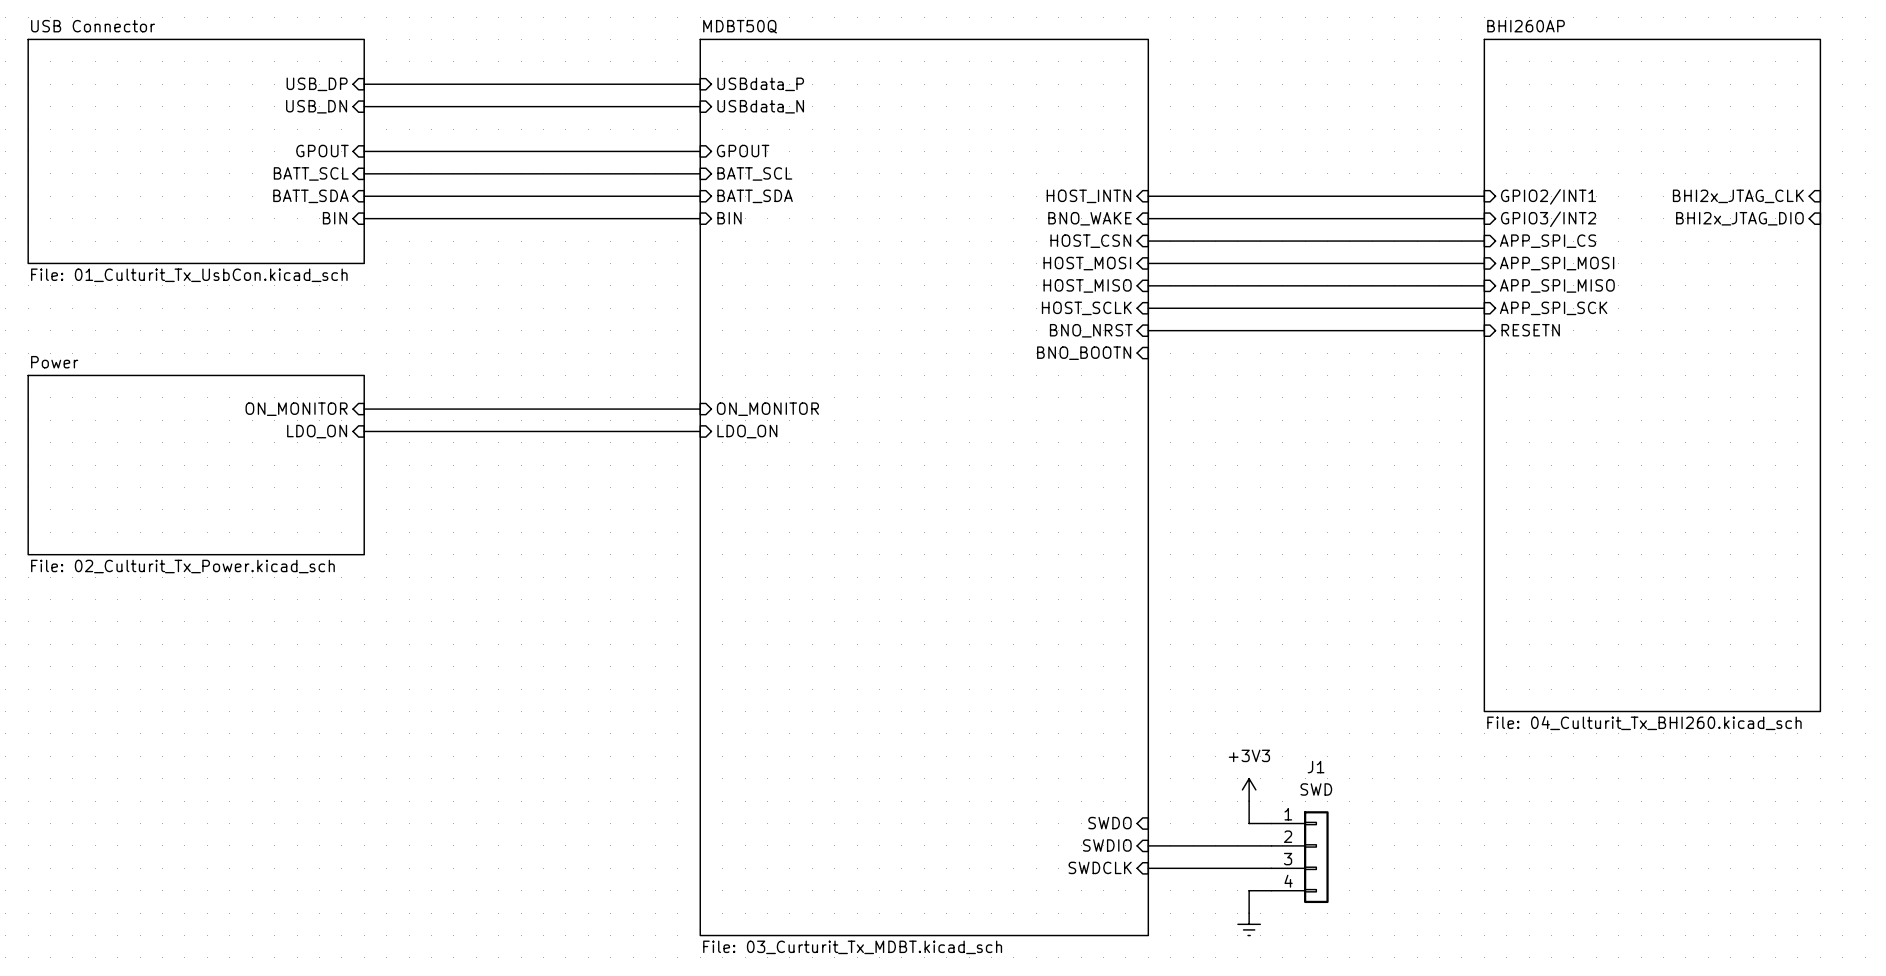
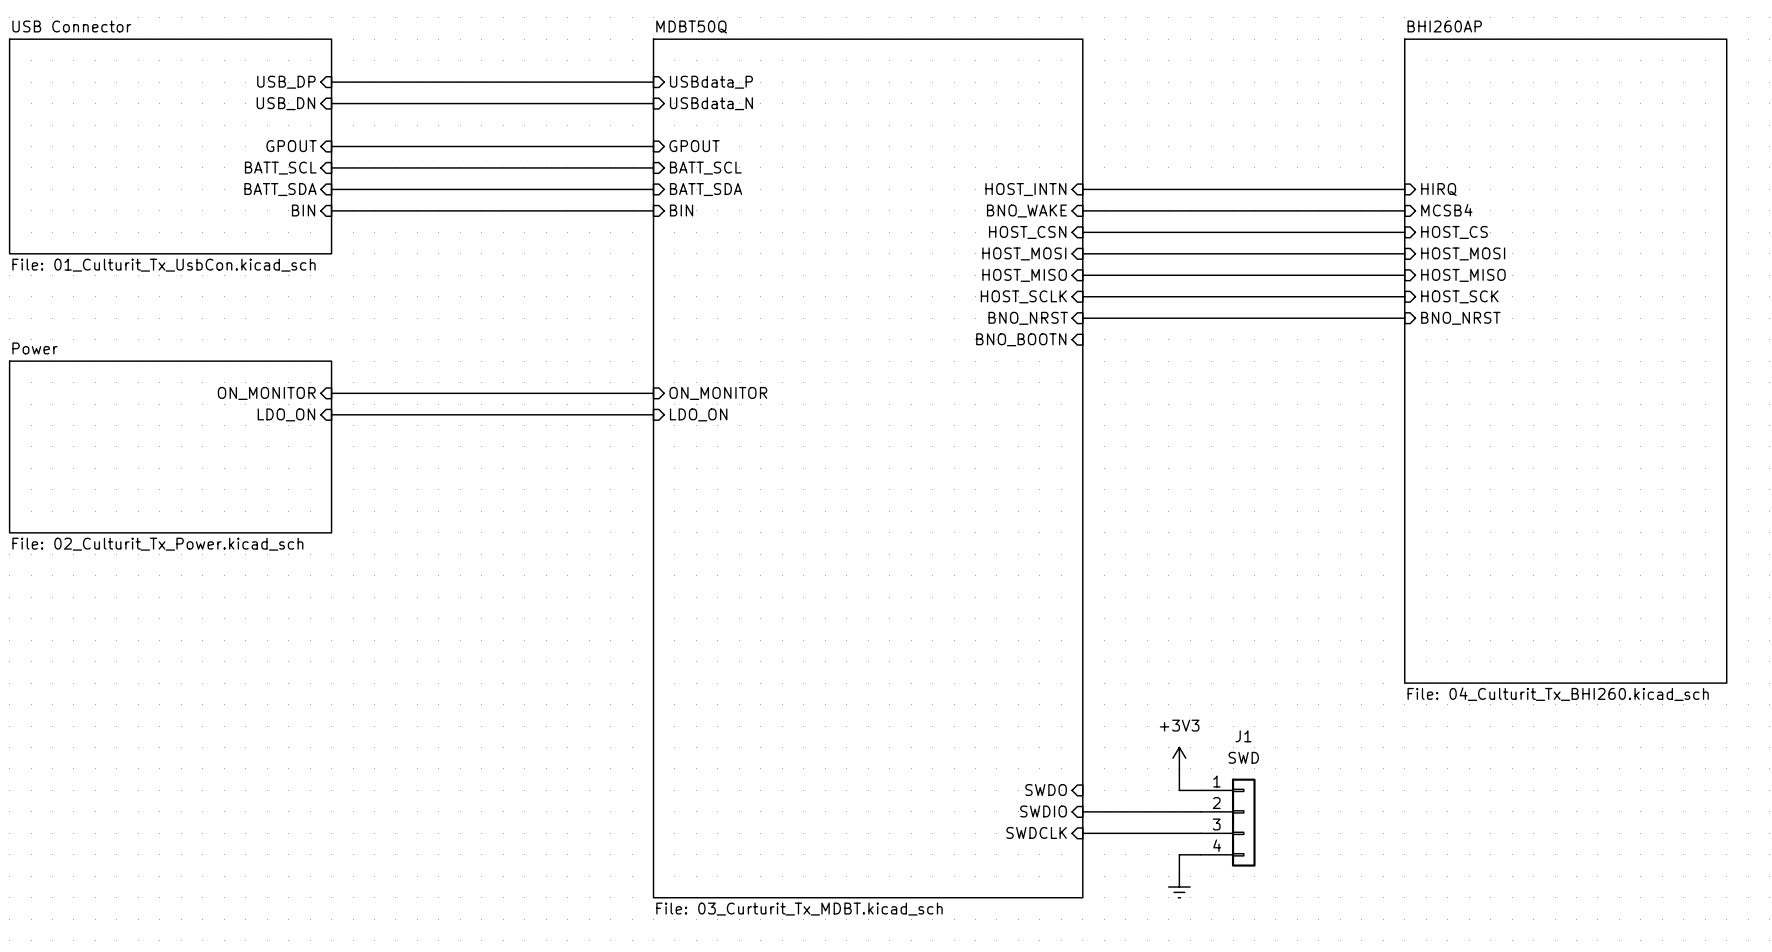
sheet pin: GPIO2/INT1 (1548, 196) -> HIRQ (1438, 189)
sheet pin: BHI2x_JTAG_CLK (1738, 196) -> none
sheet pin: BHI2x_JTAG_DIO (1739, 218) -> none
sheet pin: GPIO3/INT2 (1548, 219) -> MCSB4 (1446, 210)
sheet pin: APP_SPI_CS (1548, 241) -> HOST_CS (1454, 232)
sheet pin: APP_SPI_MOSI (1557, 263) -> HOST_MOSI (1463, 253)
sheet pin: APP_SPI_MISO (1557, 285) -> HOST_MISO (1463, 275)
sheet pin: APP_SPI_SCK (1553, 308) -> HOST_SCK (1459, 296)
sheet pin: RESETN (1530, 330) -> BNO_NRST (1460, 318)

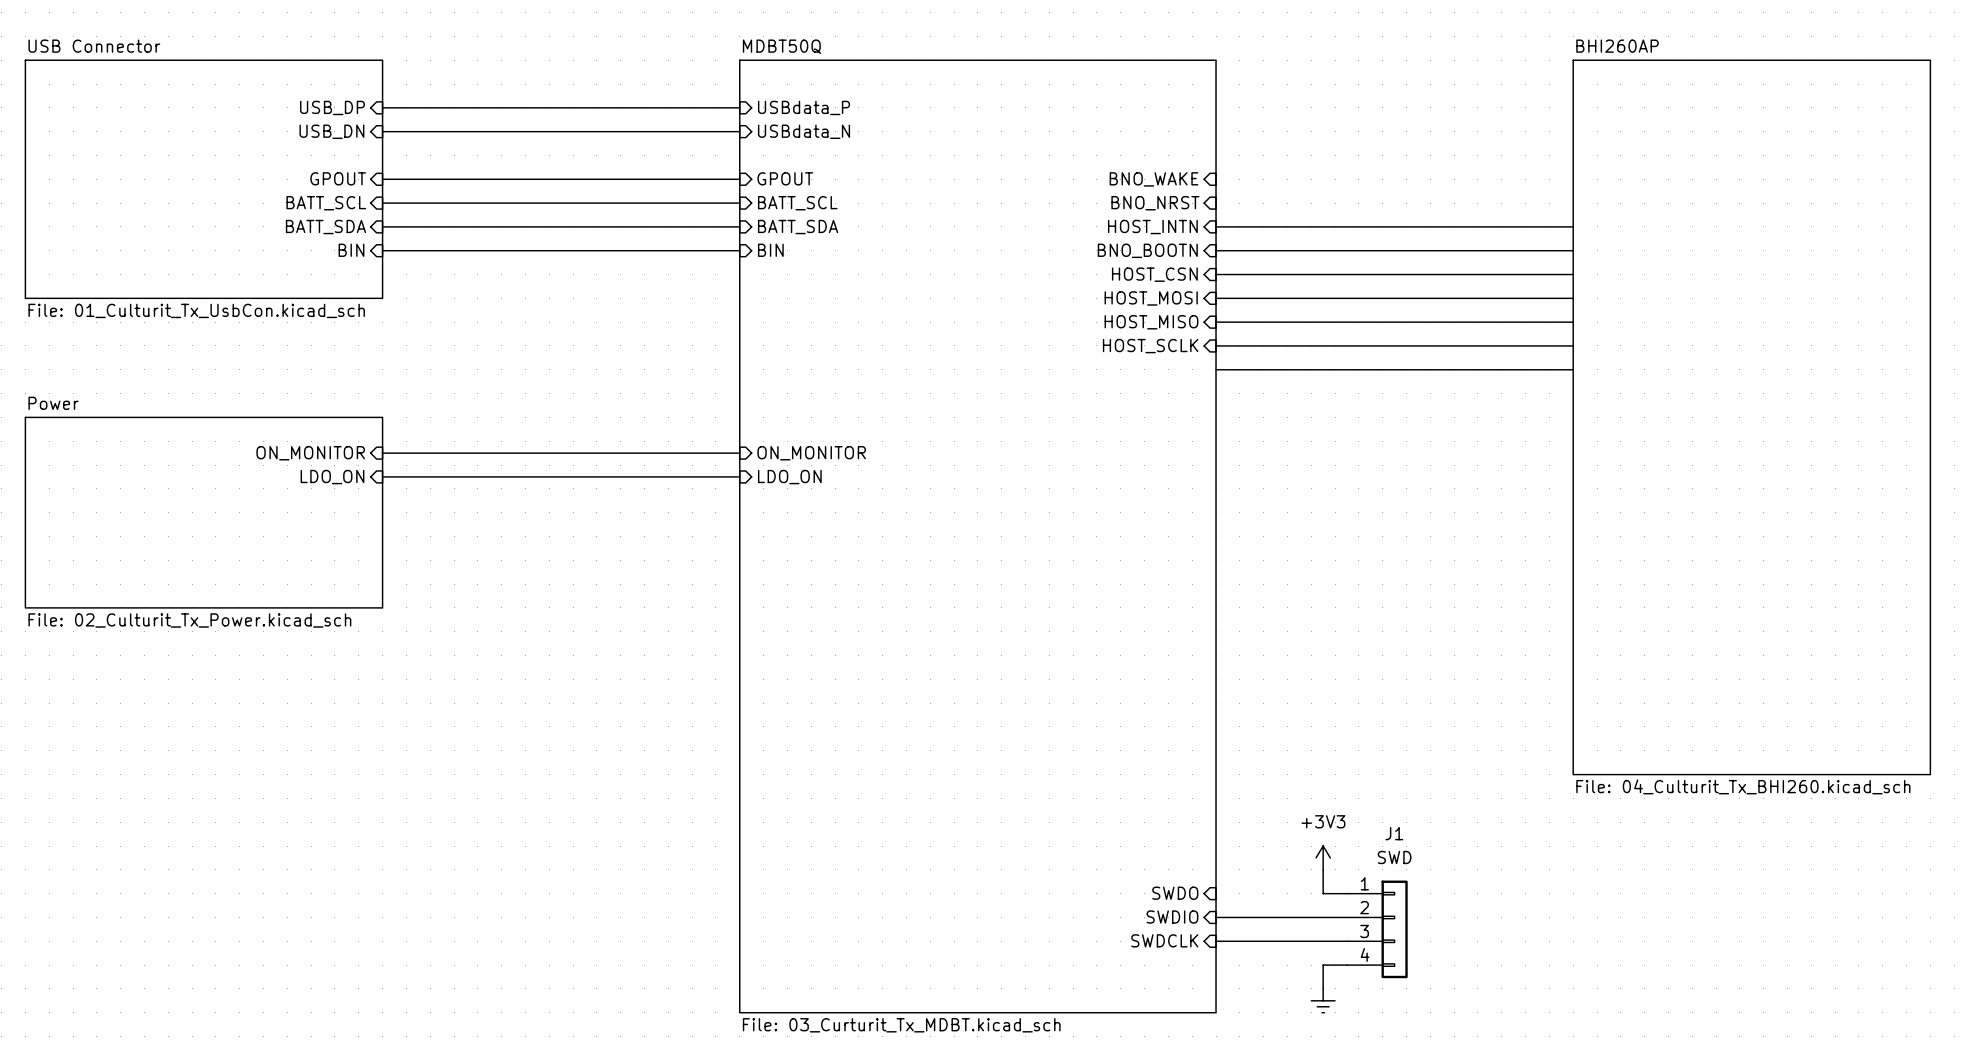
sheet pin: none -> BNO_WAKE (1154, 179)
sheet pin: HIRQ (1438, 189) -> none
sheet pin: MCSB4 (1446, 210) -> none
sheet pin: BNO_WAKE (1026, 211) -> BNO_BOOTN (1147, 250)
sheet pin: HOST_CS (1454, 232) -> none
sheet pin: HOST_MOSI (1463, 253) -> none
sheet pin: HOST_MISO (1463, 275) -> none
sheet pin: HOST_SCK (1459, 296) -> none
sheet pin position: BNO_NRST (1028, 318) -> BNO_NRST (1155, 203)
sheet pin: BNO_NRST (1460, 318) -> none
sheet pin: BNO_BOOTN (1021, 339) -> none

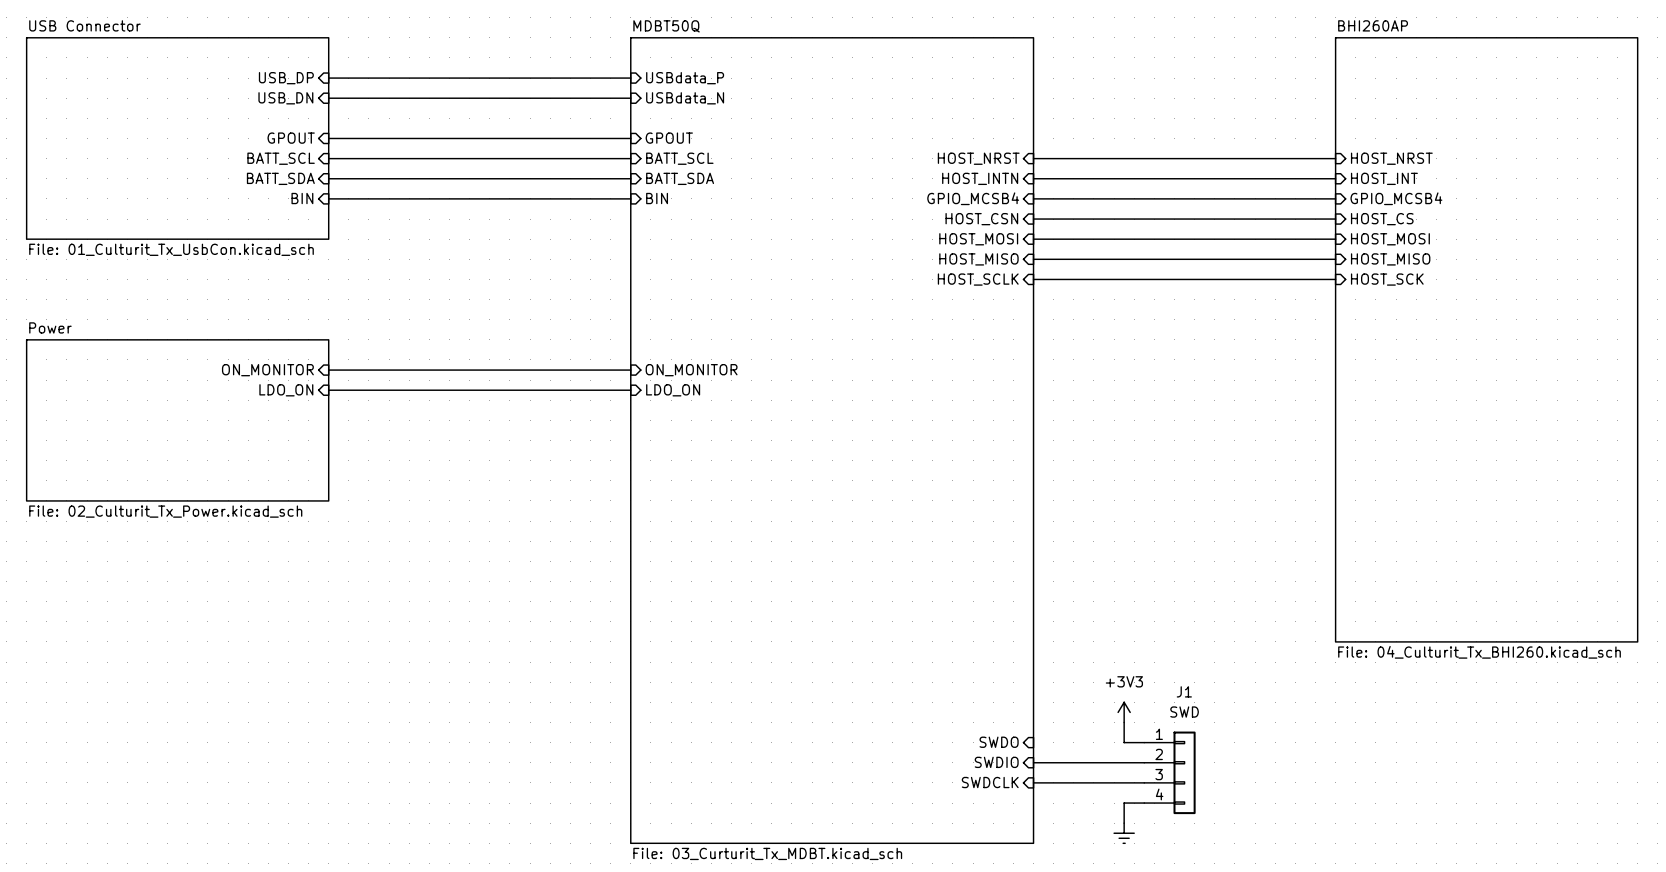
sheet pin: BNO_WAKE (1154, 179) -> none
sheet pin: BNO_NRST (1155, 203) -> HOST_NRST (978, 158)
sheet pin: none -> HOST_NRST (1391, 158)
sheet pin: none -> HOST_INT (1384, 178)
sheet pin: BNO_BOOTN (1147, 250) -> GPIO_MCSB4 (973, 198)
sheet pin: none -> GPIO_MCSB4 (1396, 198)
sheet pin: none -> HOST_CS (1382, 219)
sheet pin: none -> HOST_MOSI (1390, 239)
sheet pin: none -> HOST_MISO (1390, 259)
sheet pin: none -> HOST_SCK (1387, 279)
wire: (1216, 369) (1573, 369) -> (1033, 158) (1335, 158)

